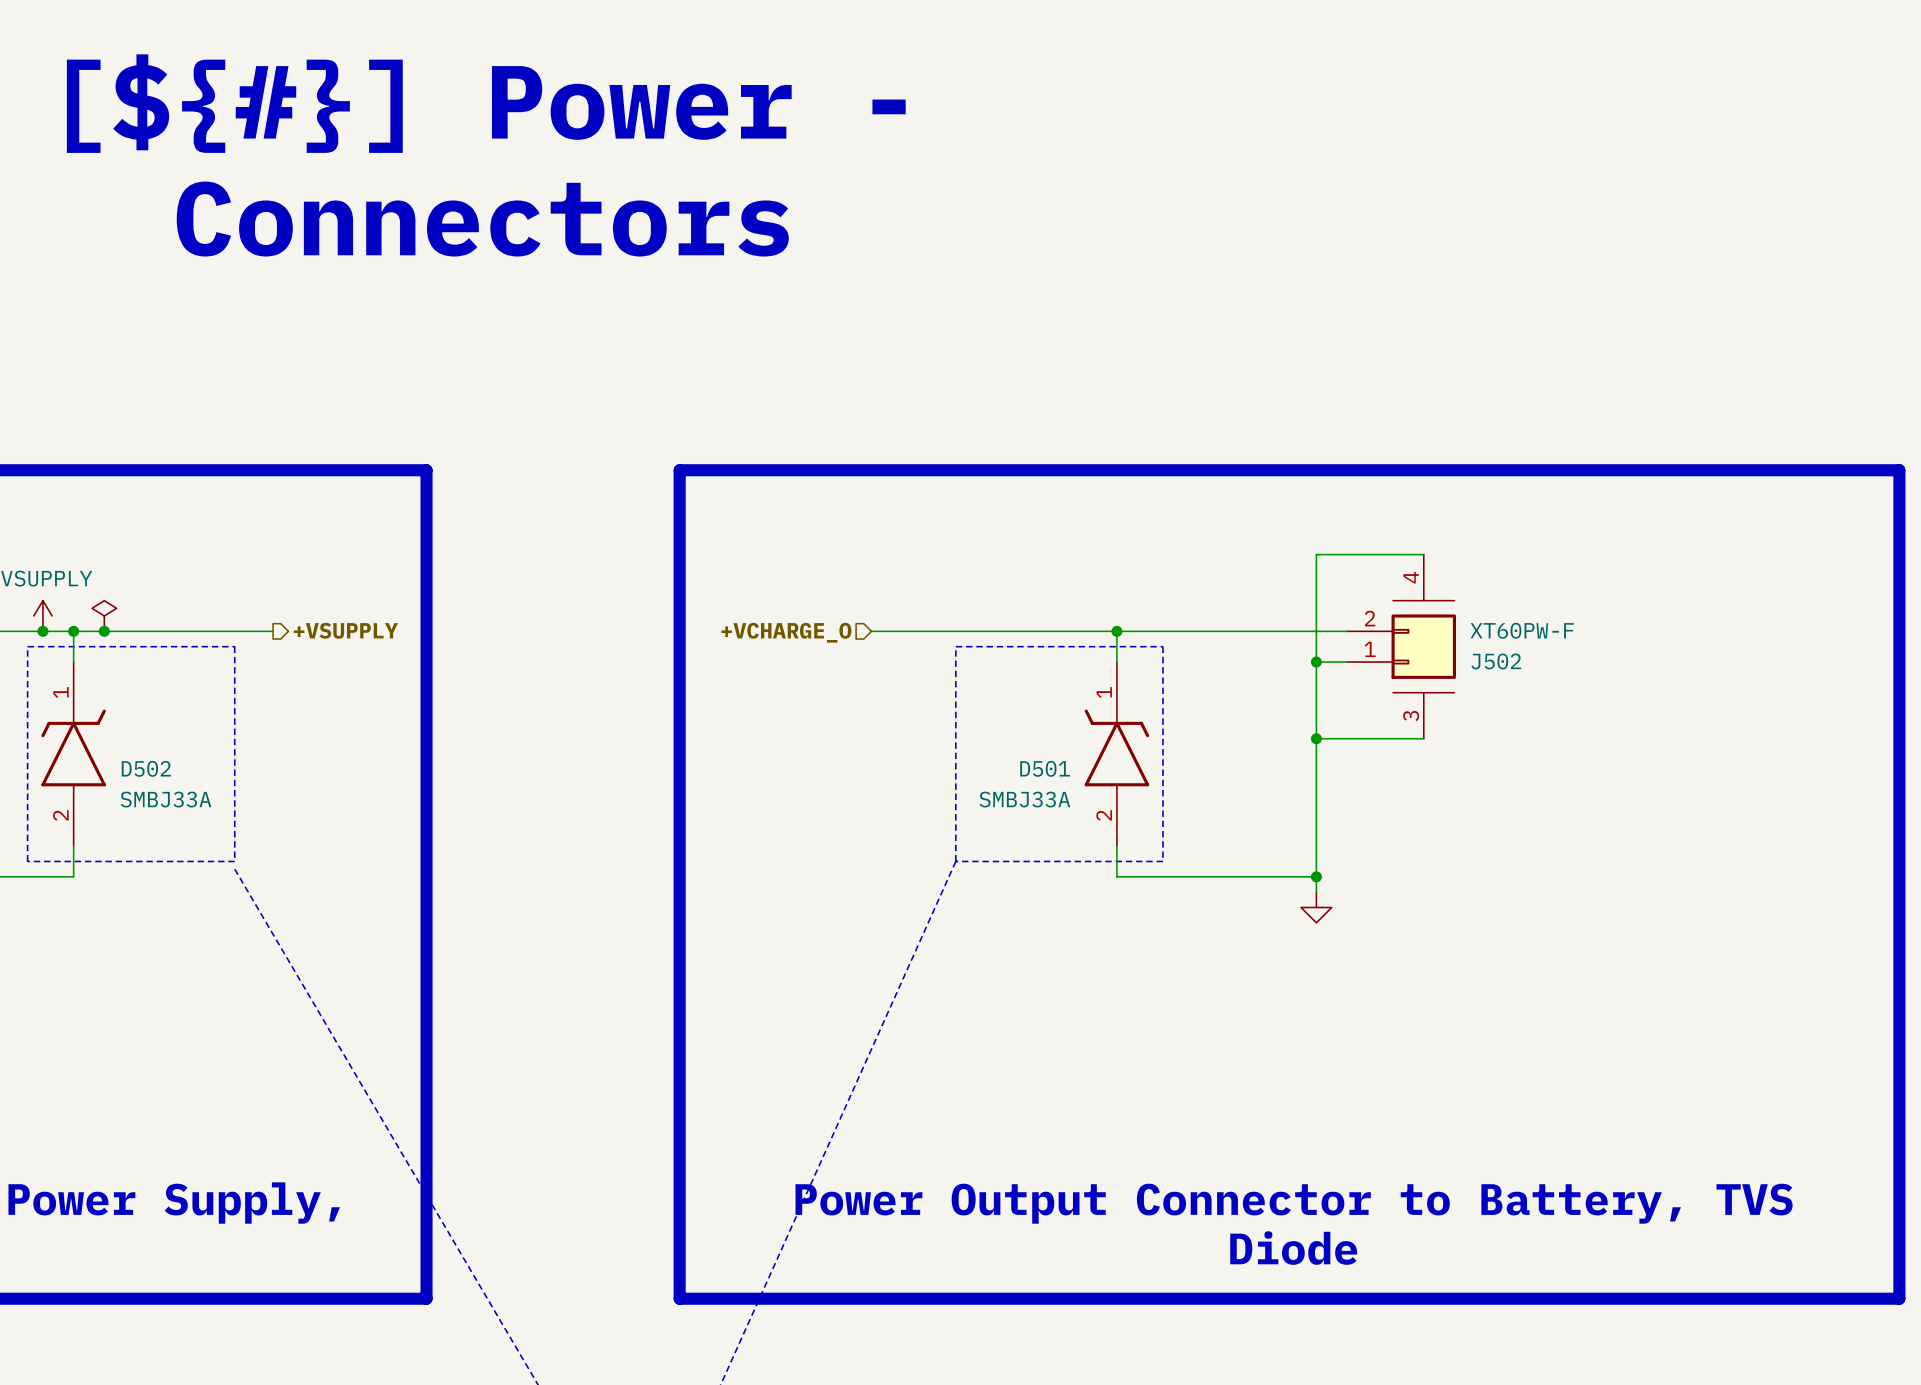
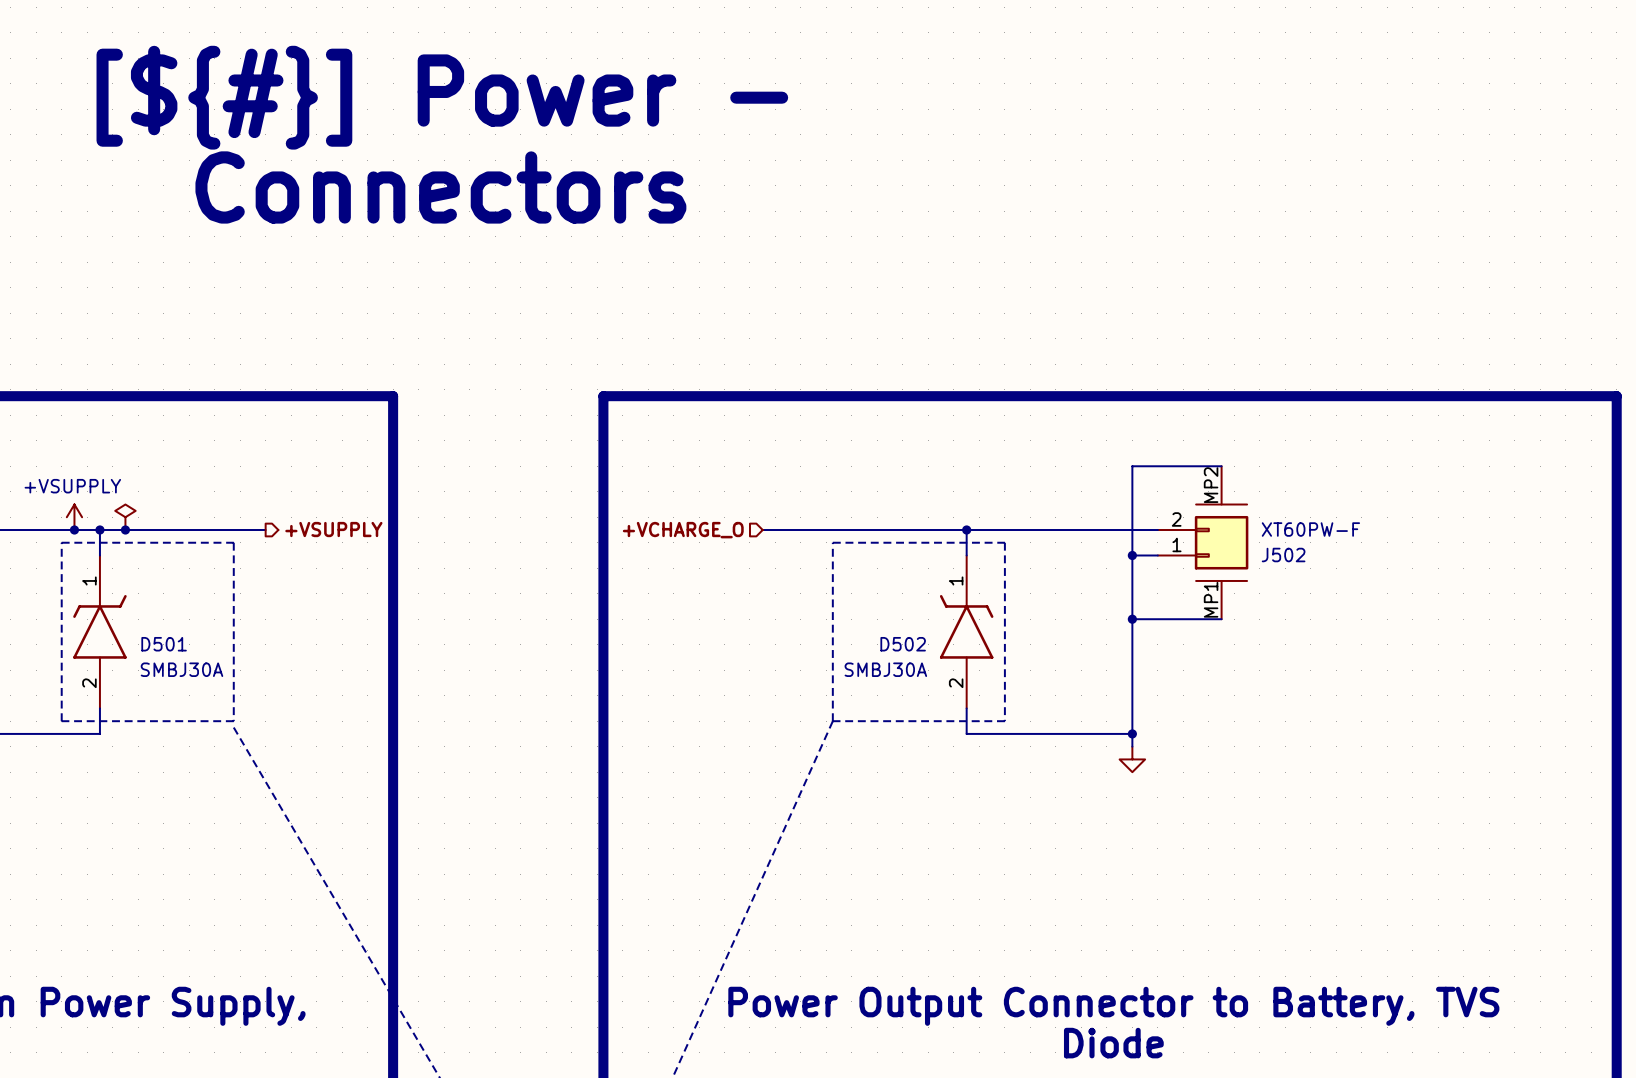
J502 pin number: 4 (1411, 577) -> MP2 (1211, 485)
J502 pin number: 3 (1411, 716) -> MP1 (1211, 599)
D502 name: D502 (146, 768) -> D501 (164, 644)
D501 name: D501 (1045, 768) -> D502 (903, 644)
D502 value: SMBJ33A (165, 799) -> SMBJ30A (181, 669)
D501 value: SMBJ33A (1024, 799) -> SMBJ30A (885, 669)

